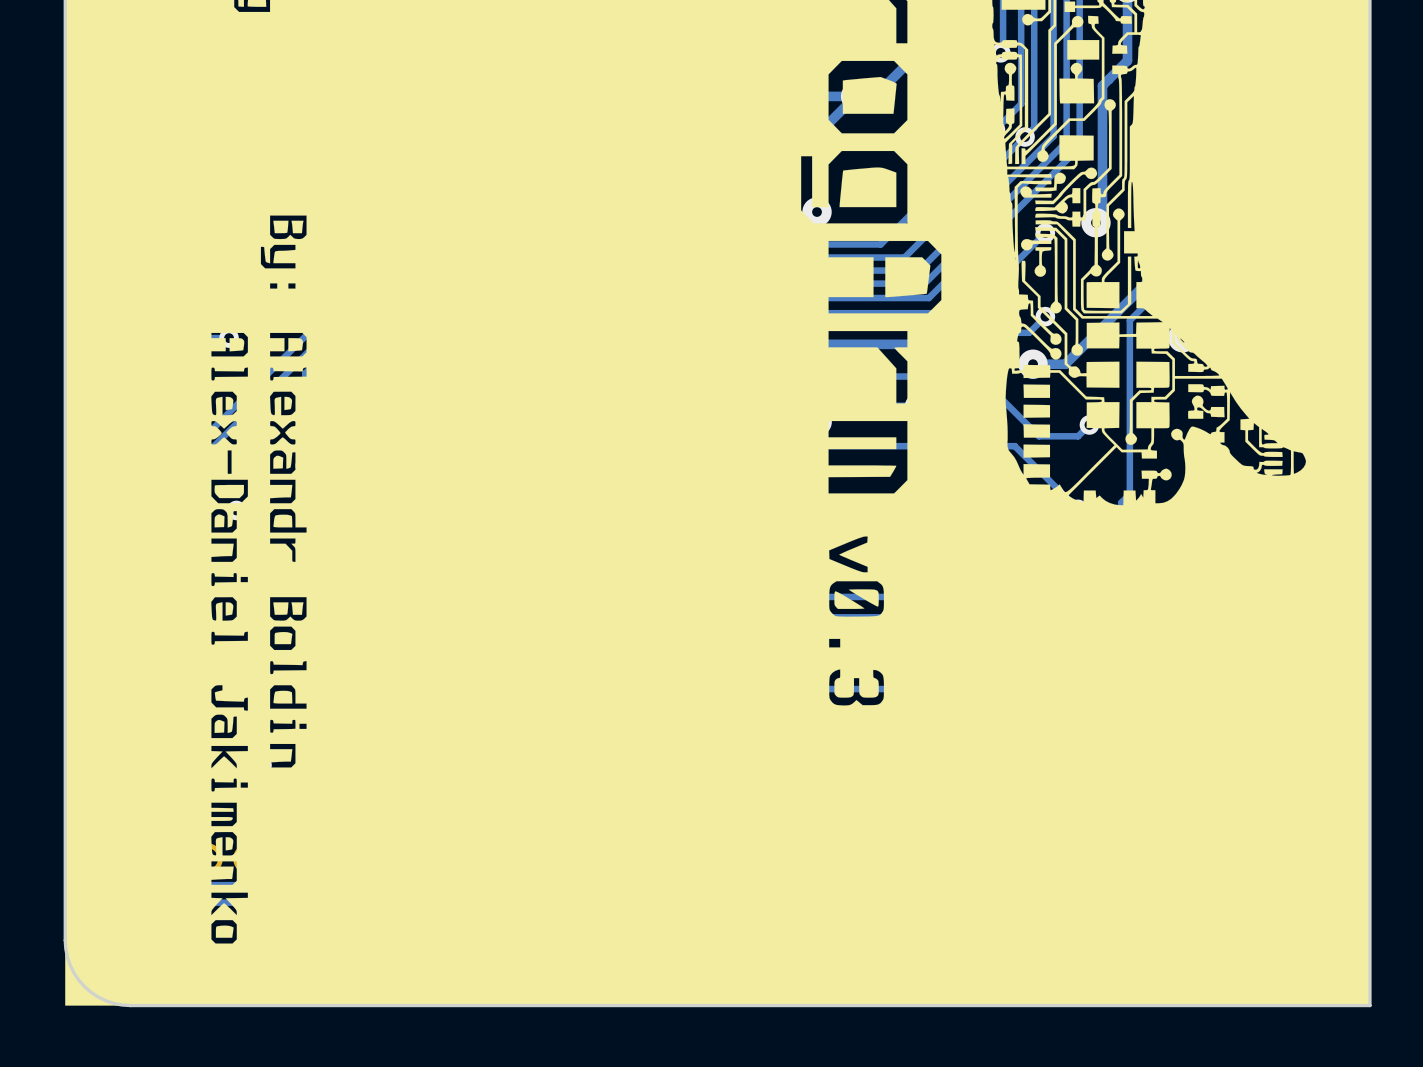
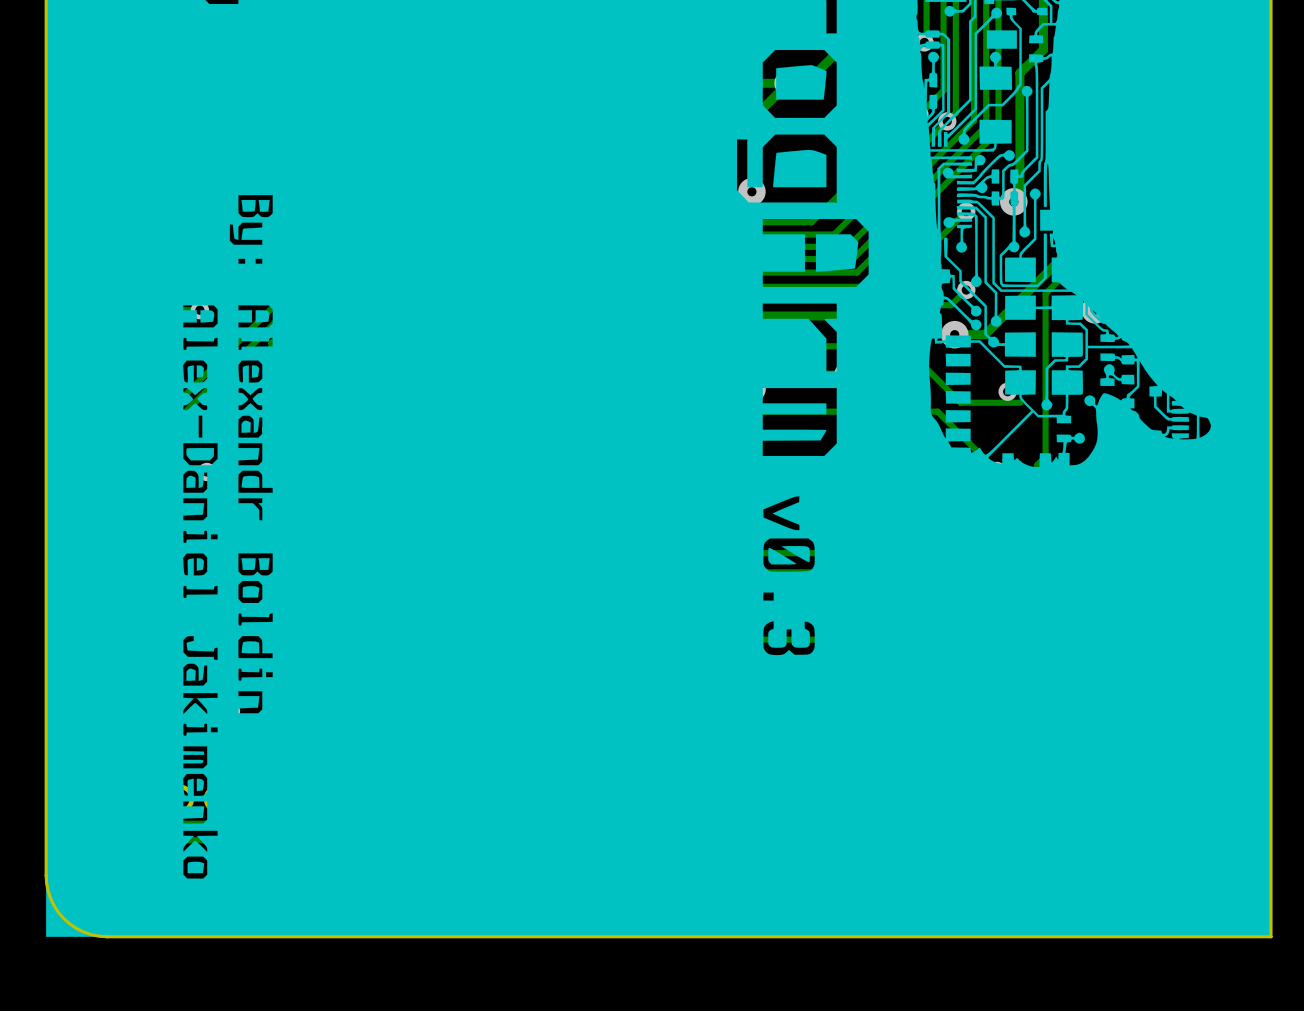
track: (1089, 424) (1078, 436) (1038, 436) -> (1020, 402) (960, 402)

